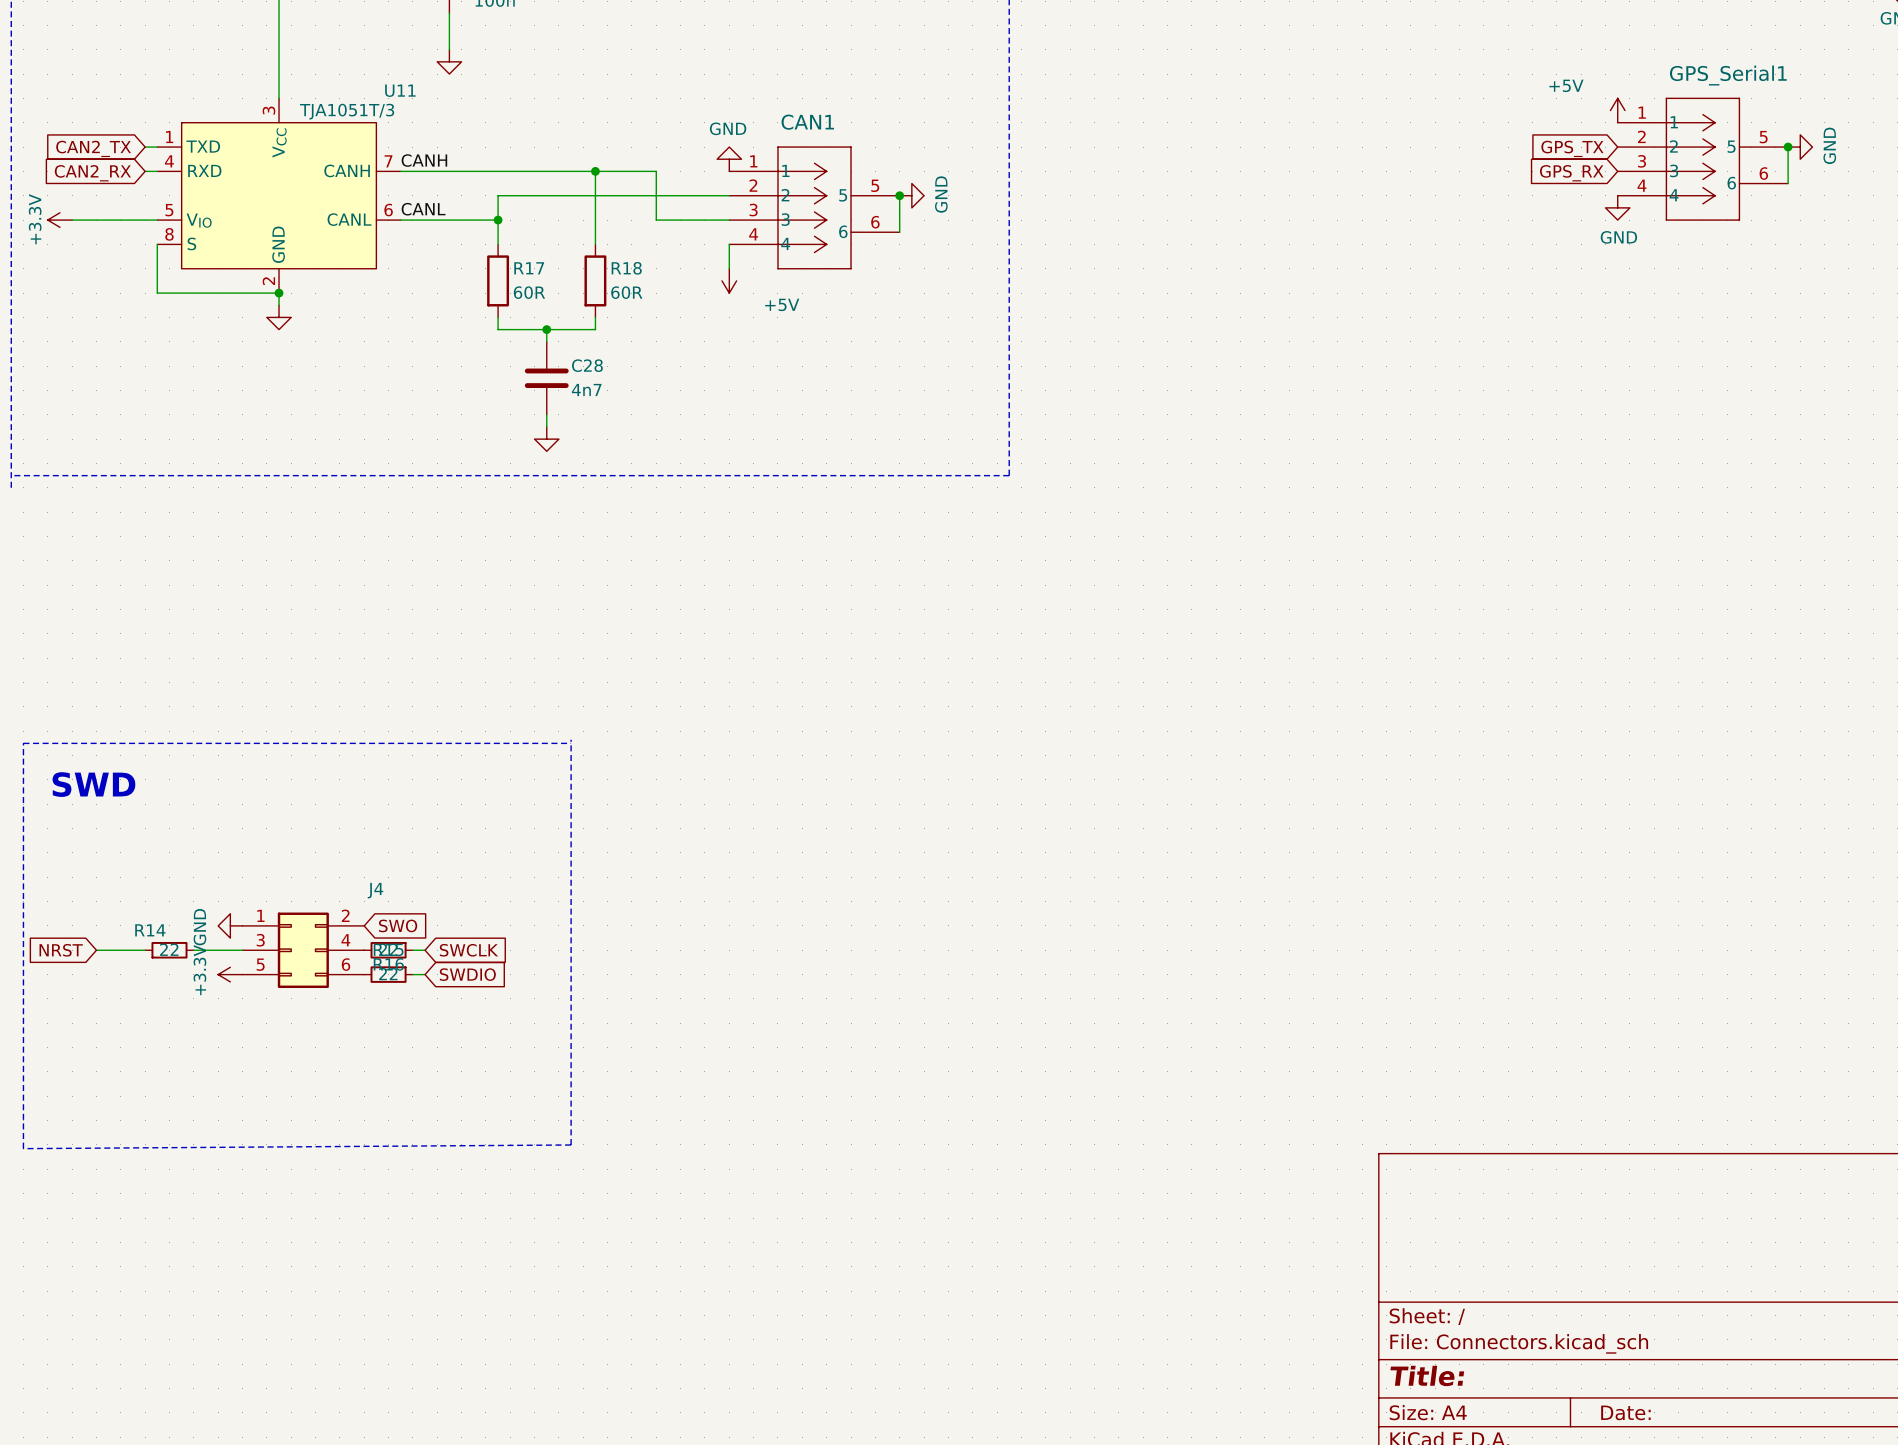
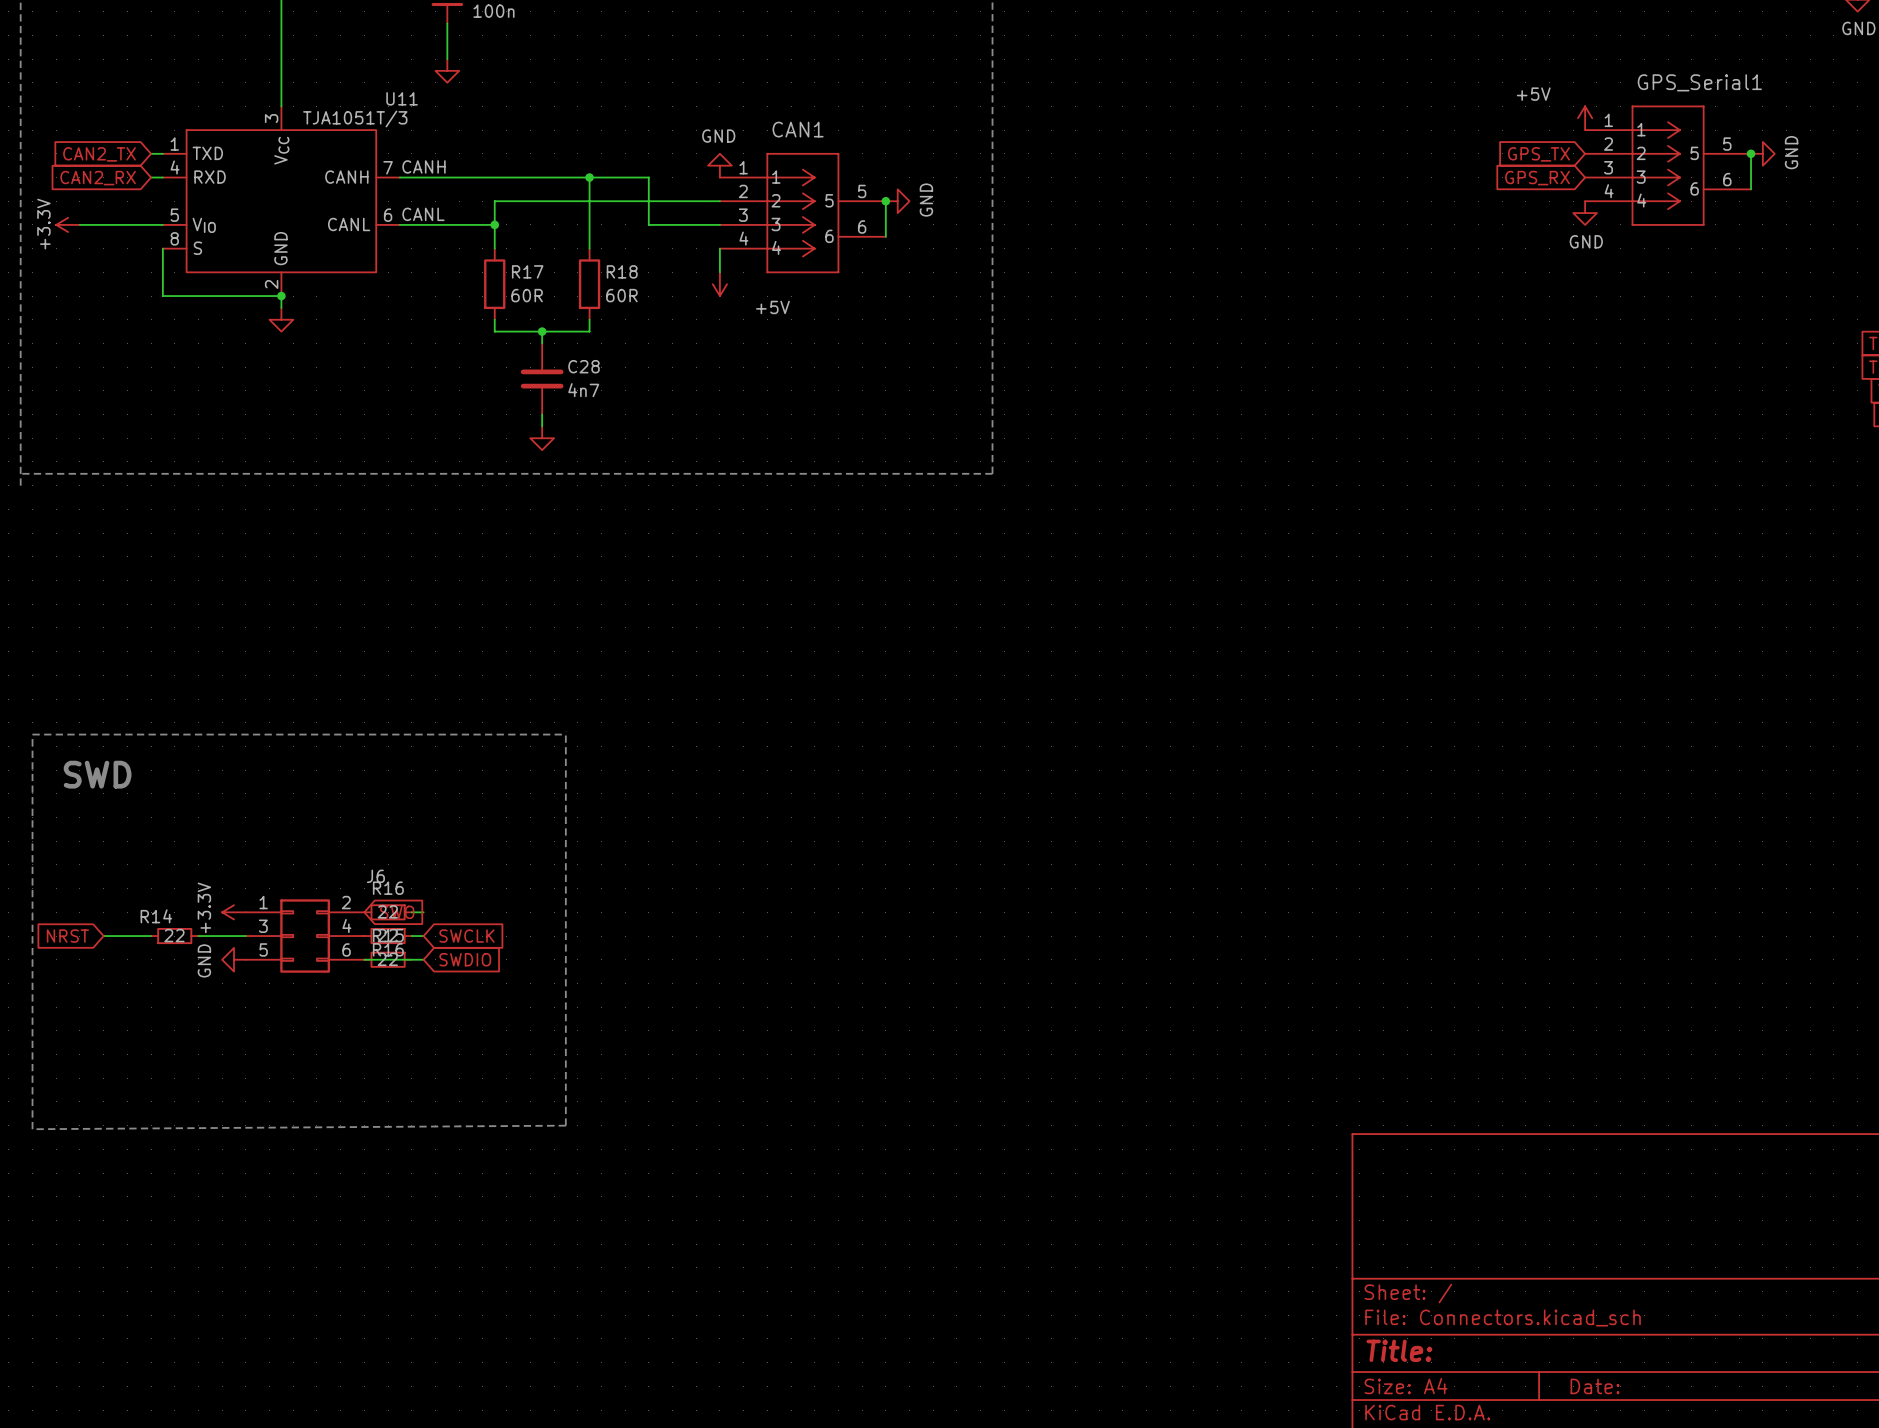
J4 name: J4 (375, 890) -> J6 (375, 876)
power symbol: GND (230, 925) -> +3.3V (234, 912)
R16: none -> 22 (388, 912)
wire: none -> (411, 912) (423, 912)
power symbol: +3.3V (230, 974) -> GND (234, 959)
wire: none -> (364, 959) (411, 959)

